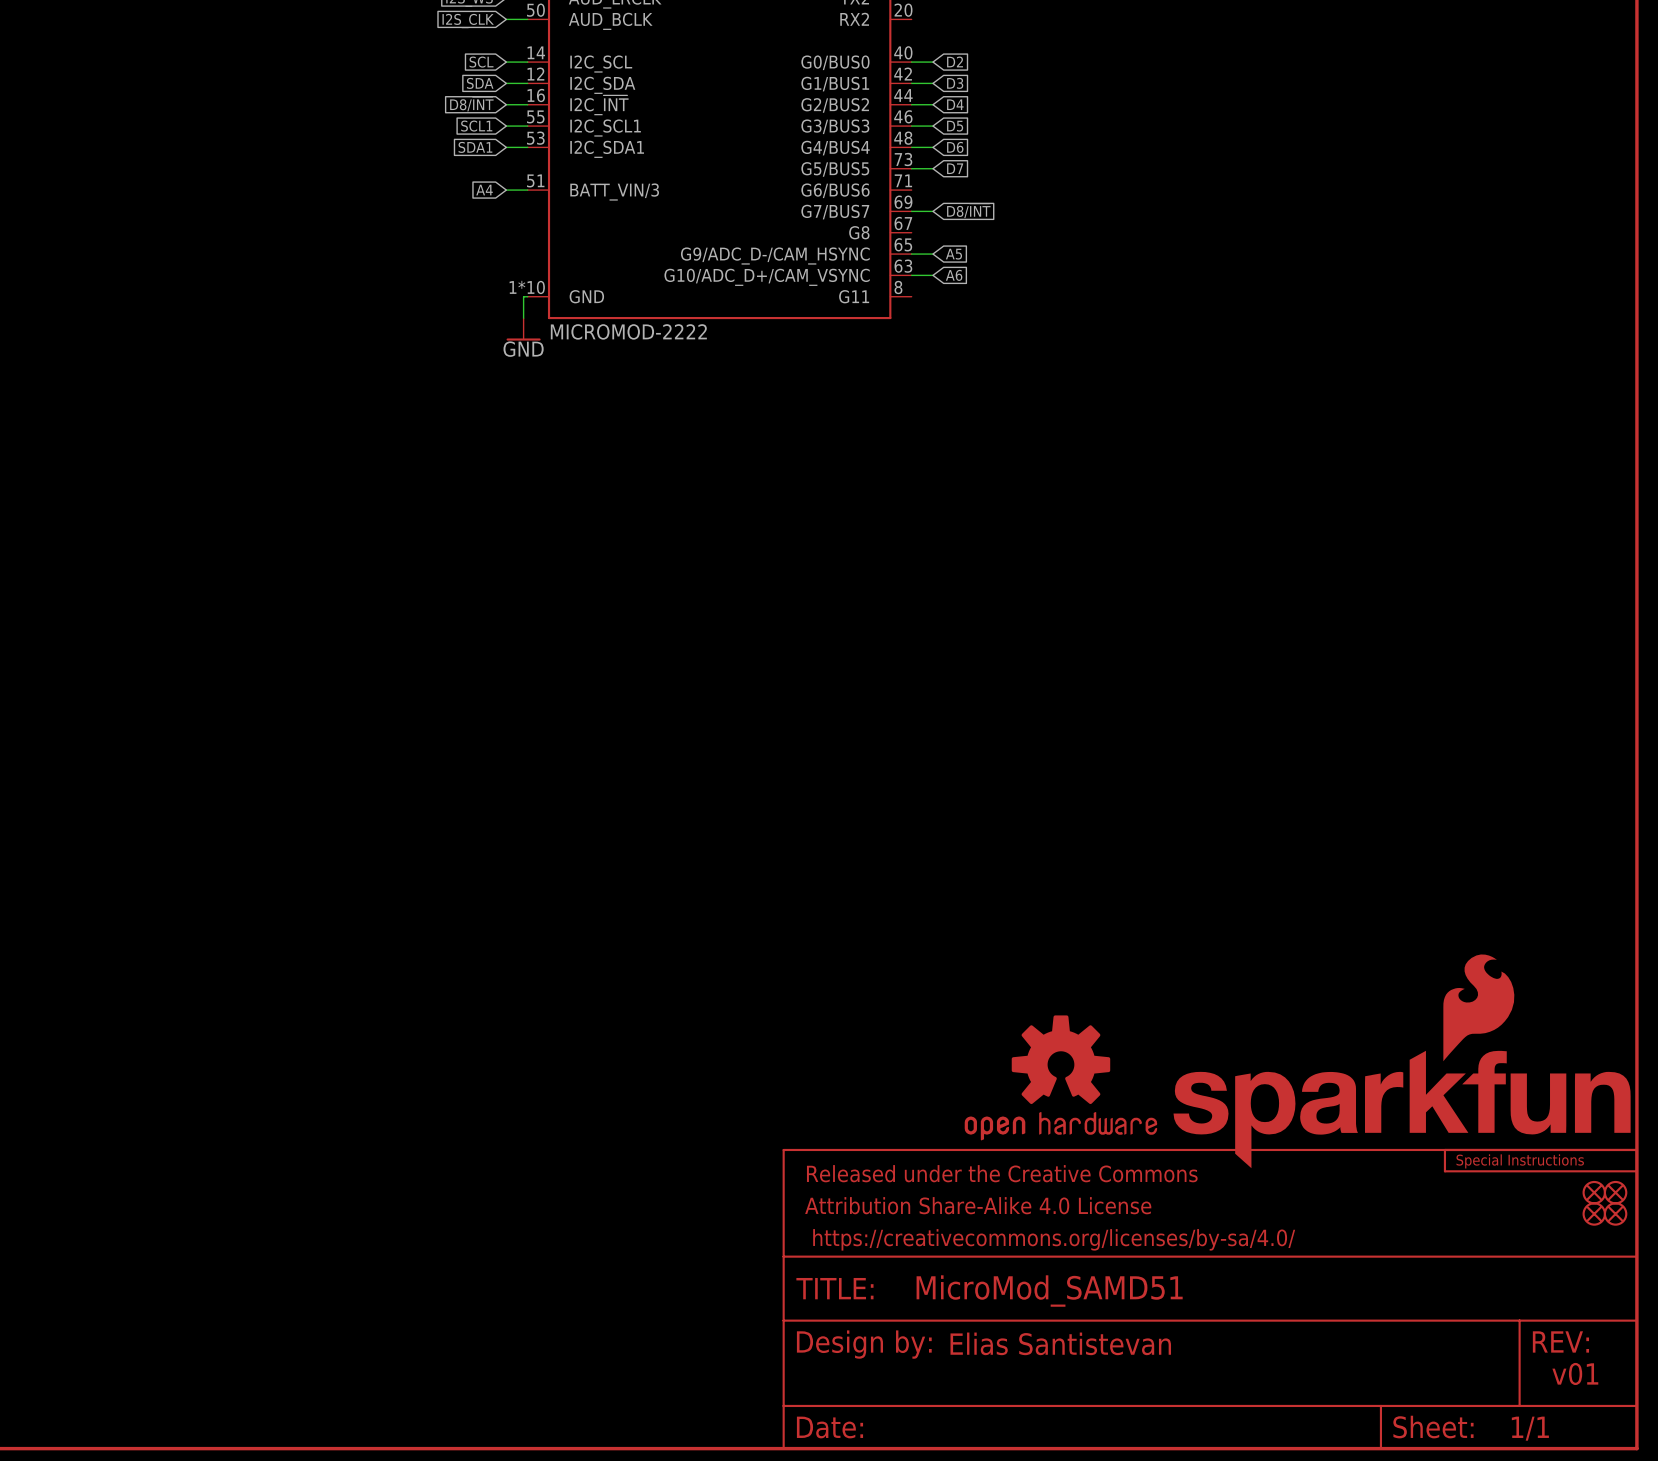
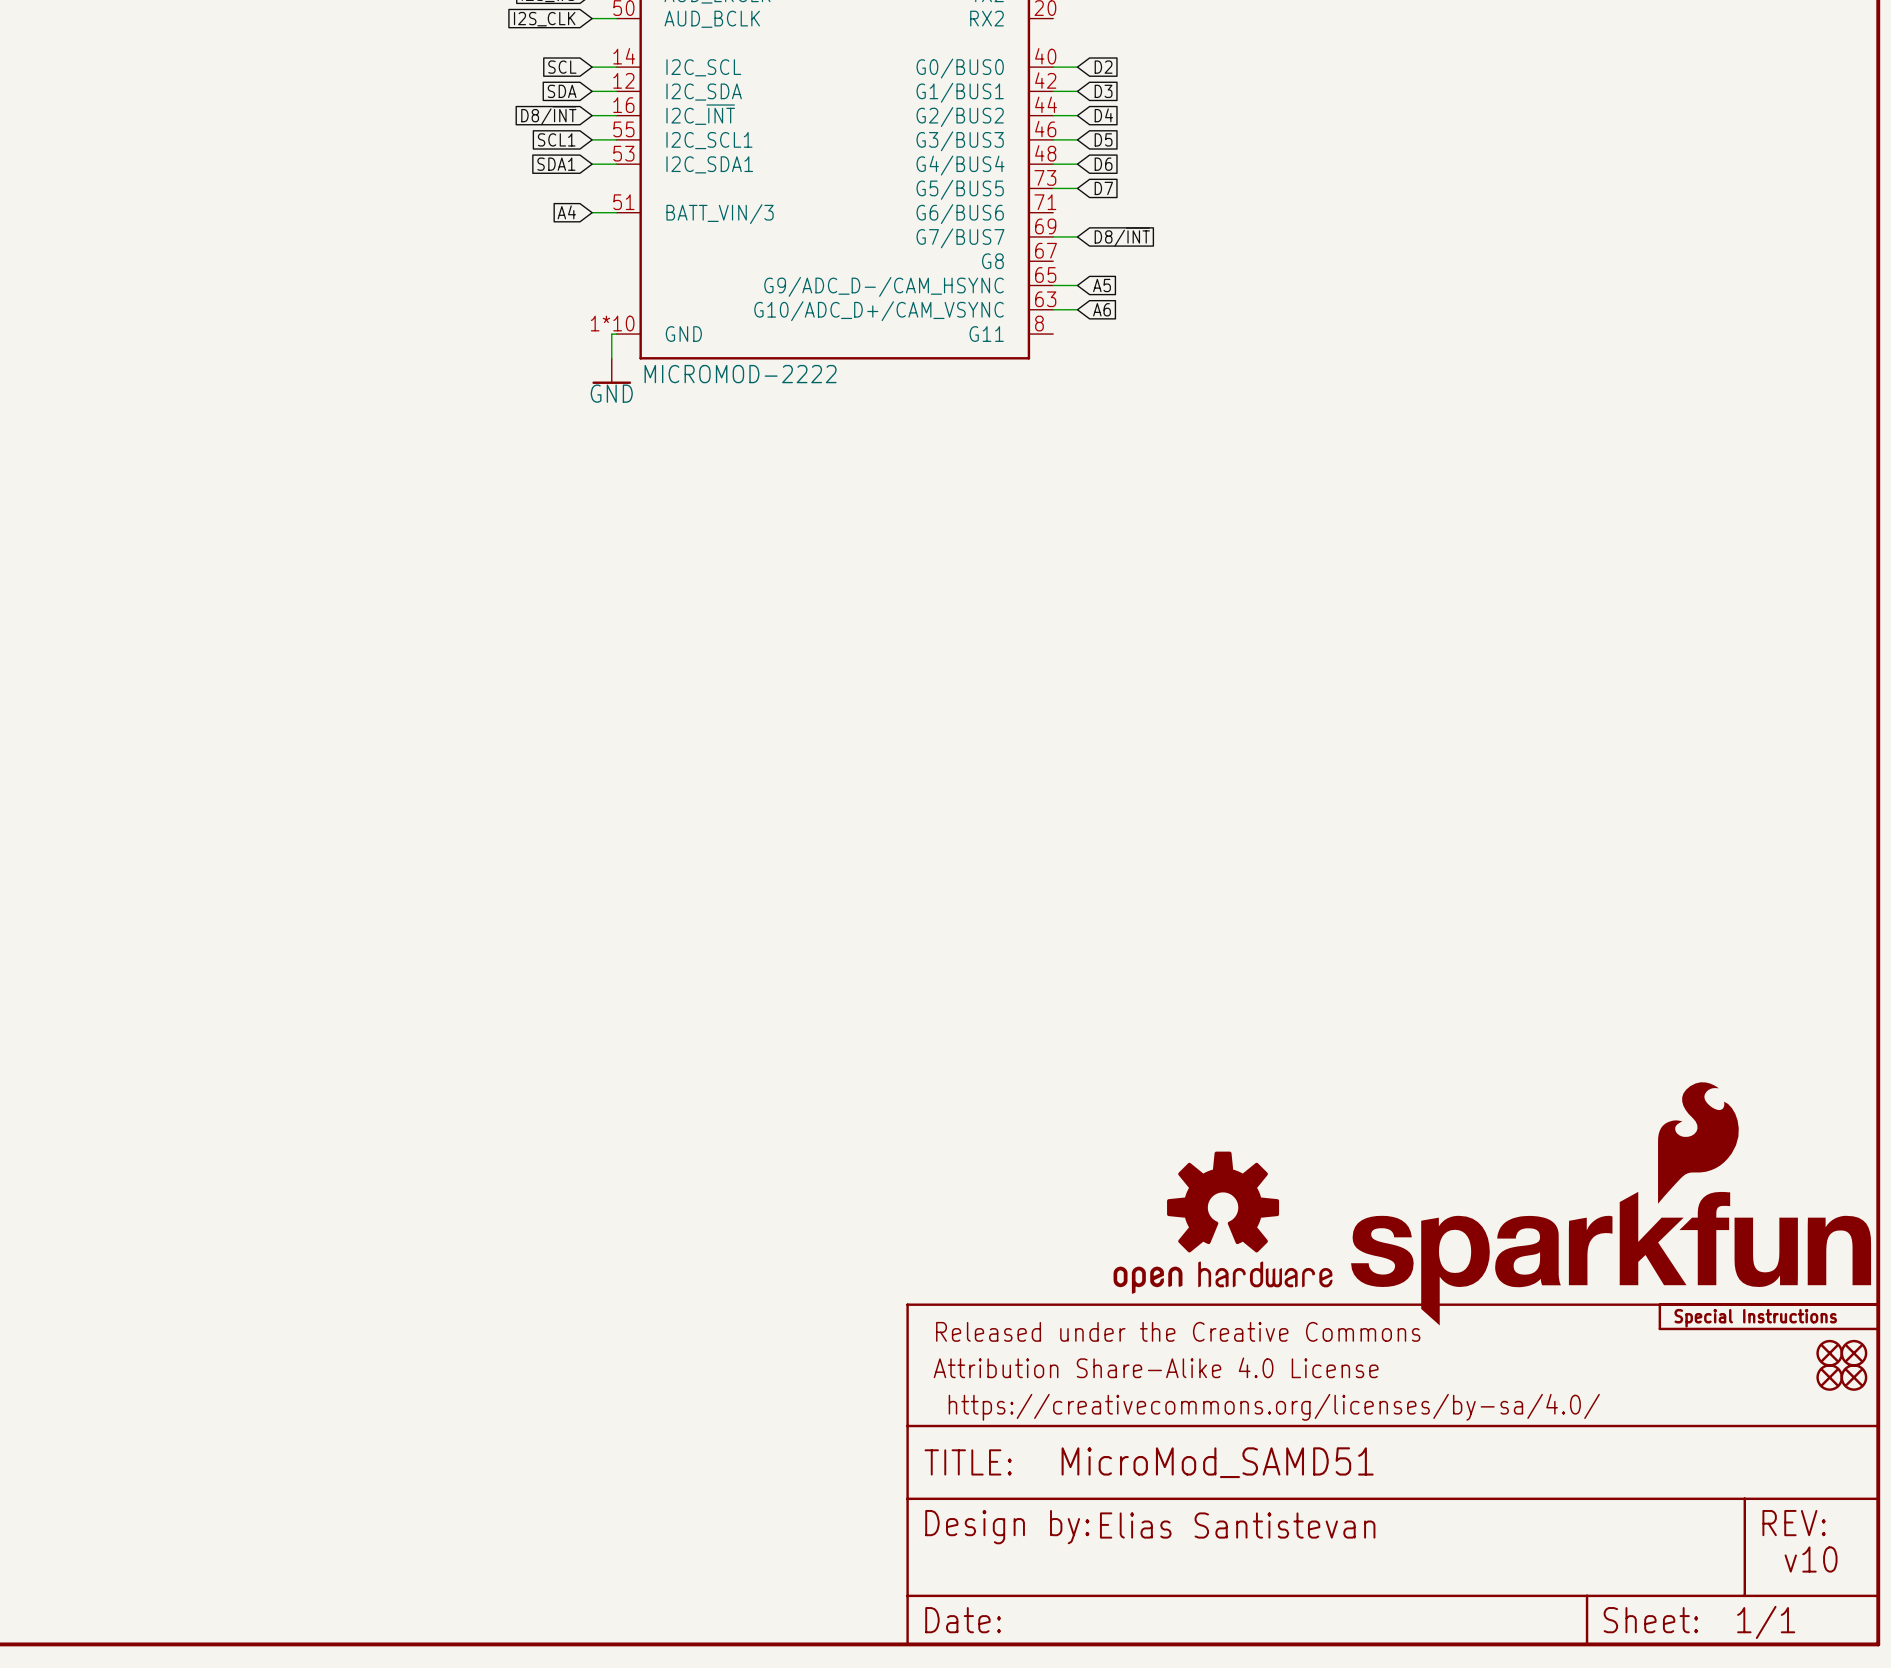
text: v01 (1575, 1373) -> v10 (1811, 1559)

